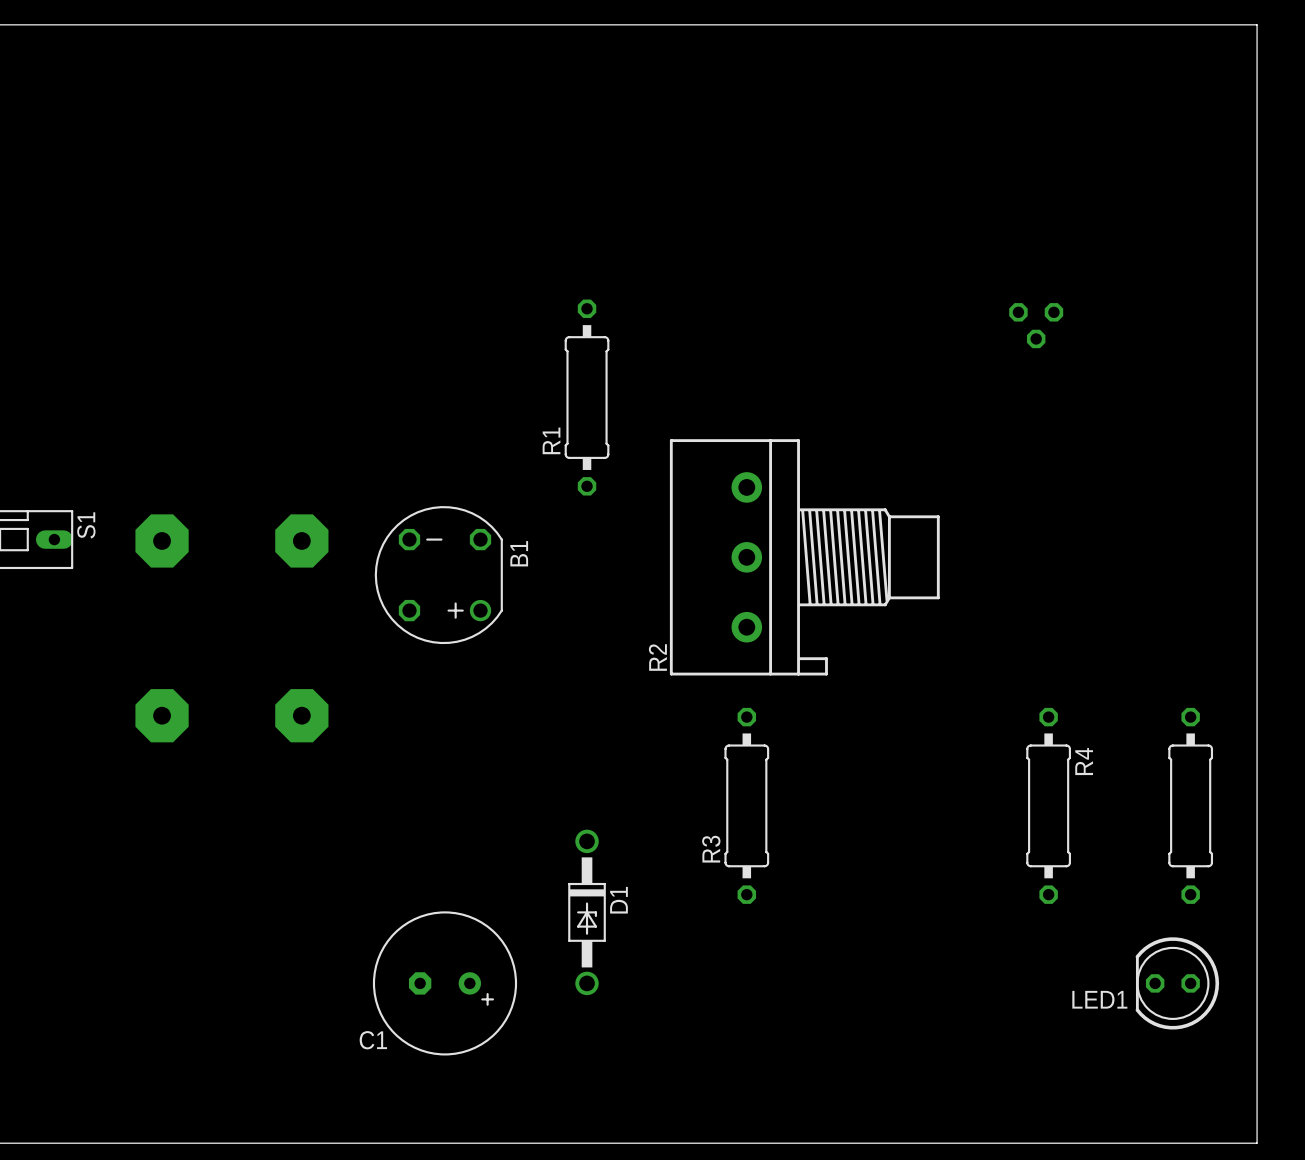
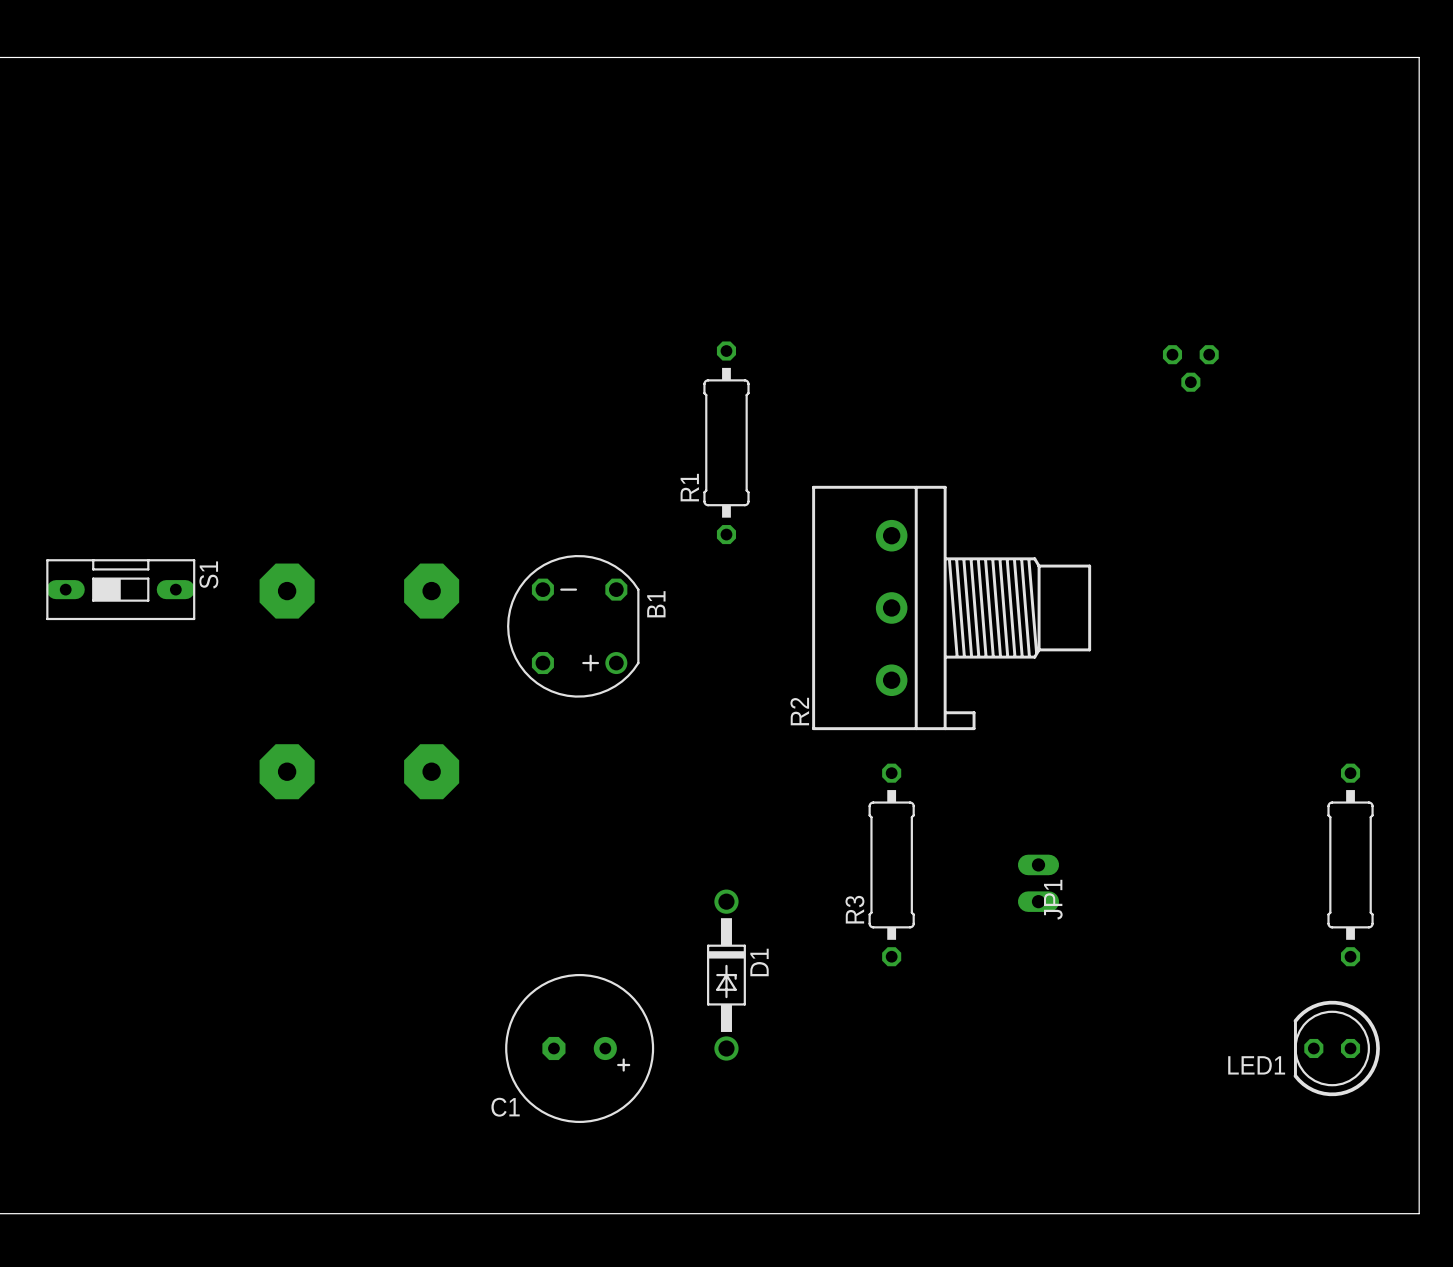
R4: (1048, 805) -> none
JP1: none -> (1038, 883)

